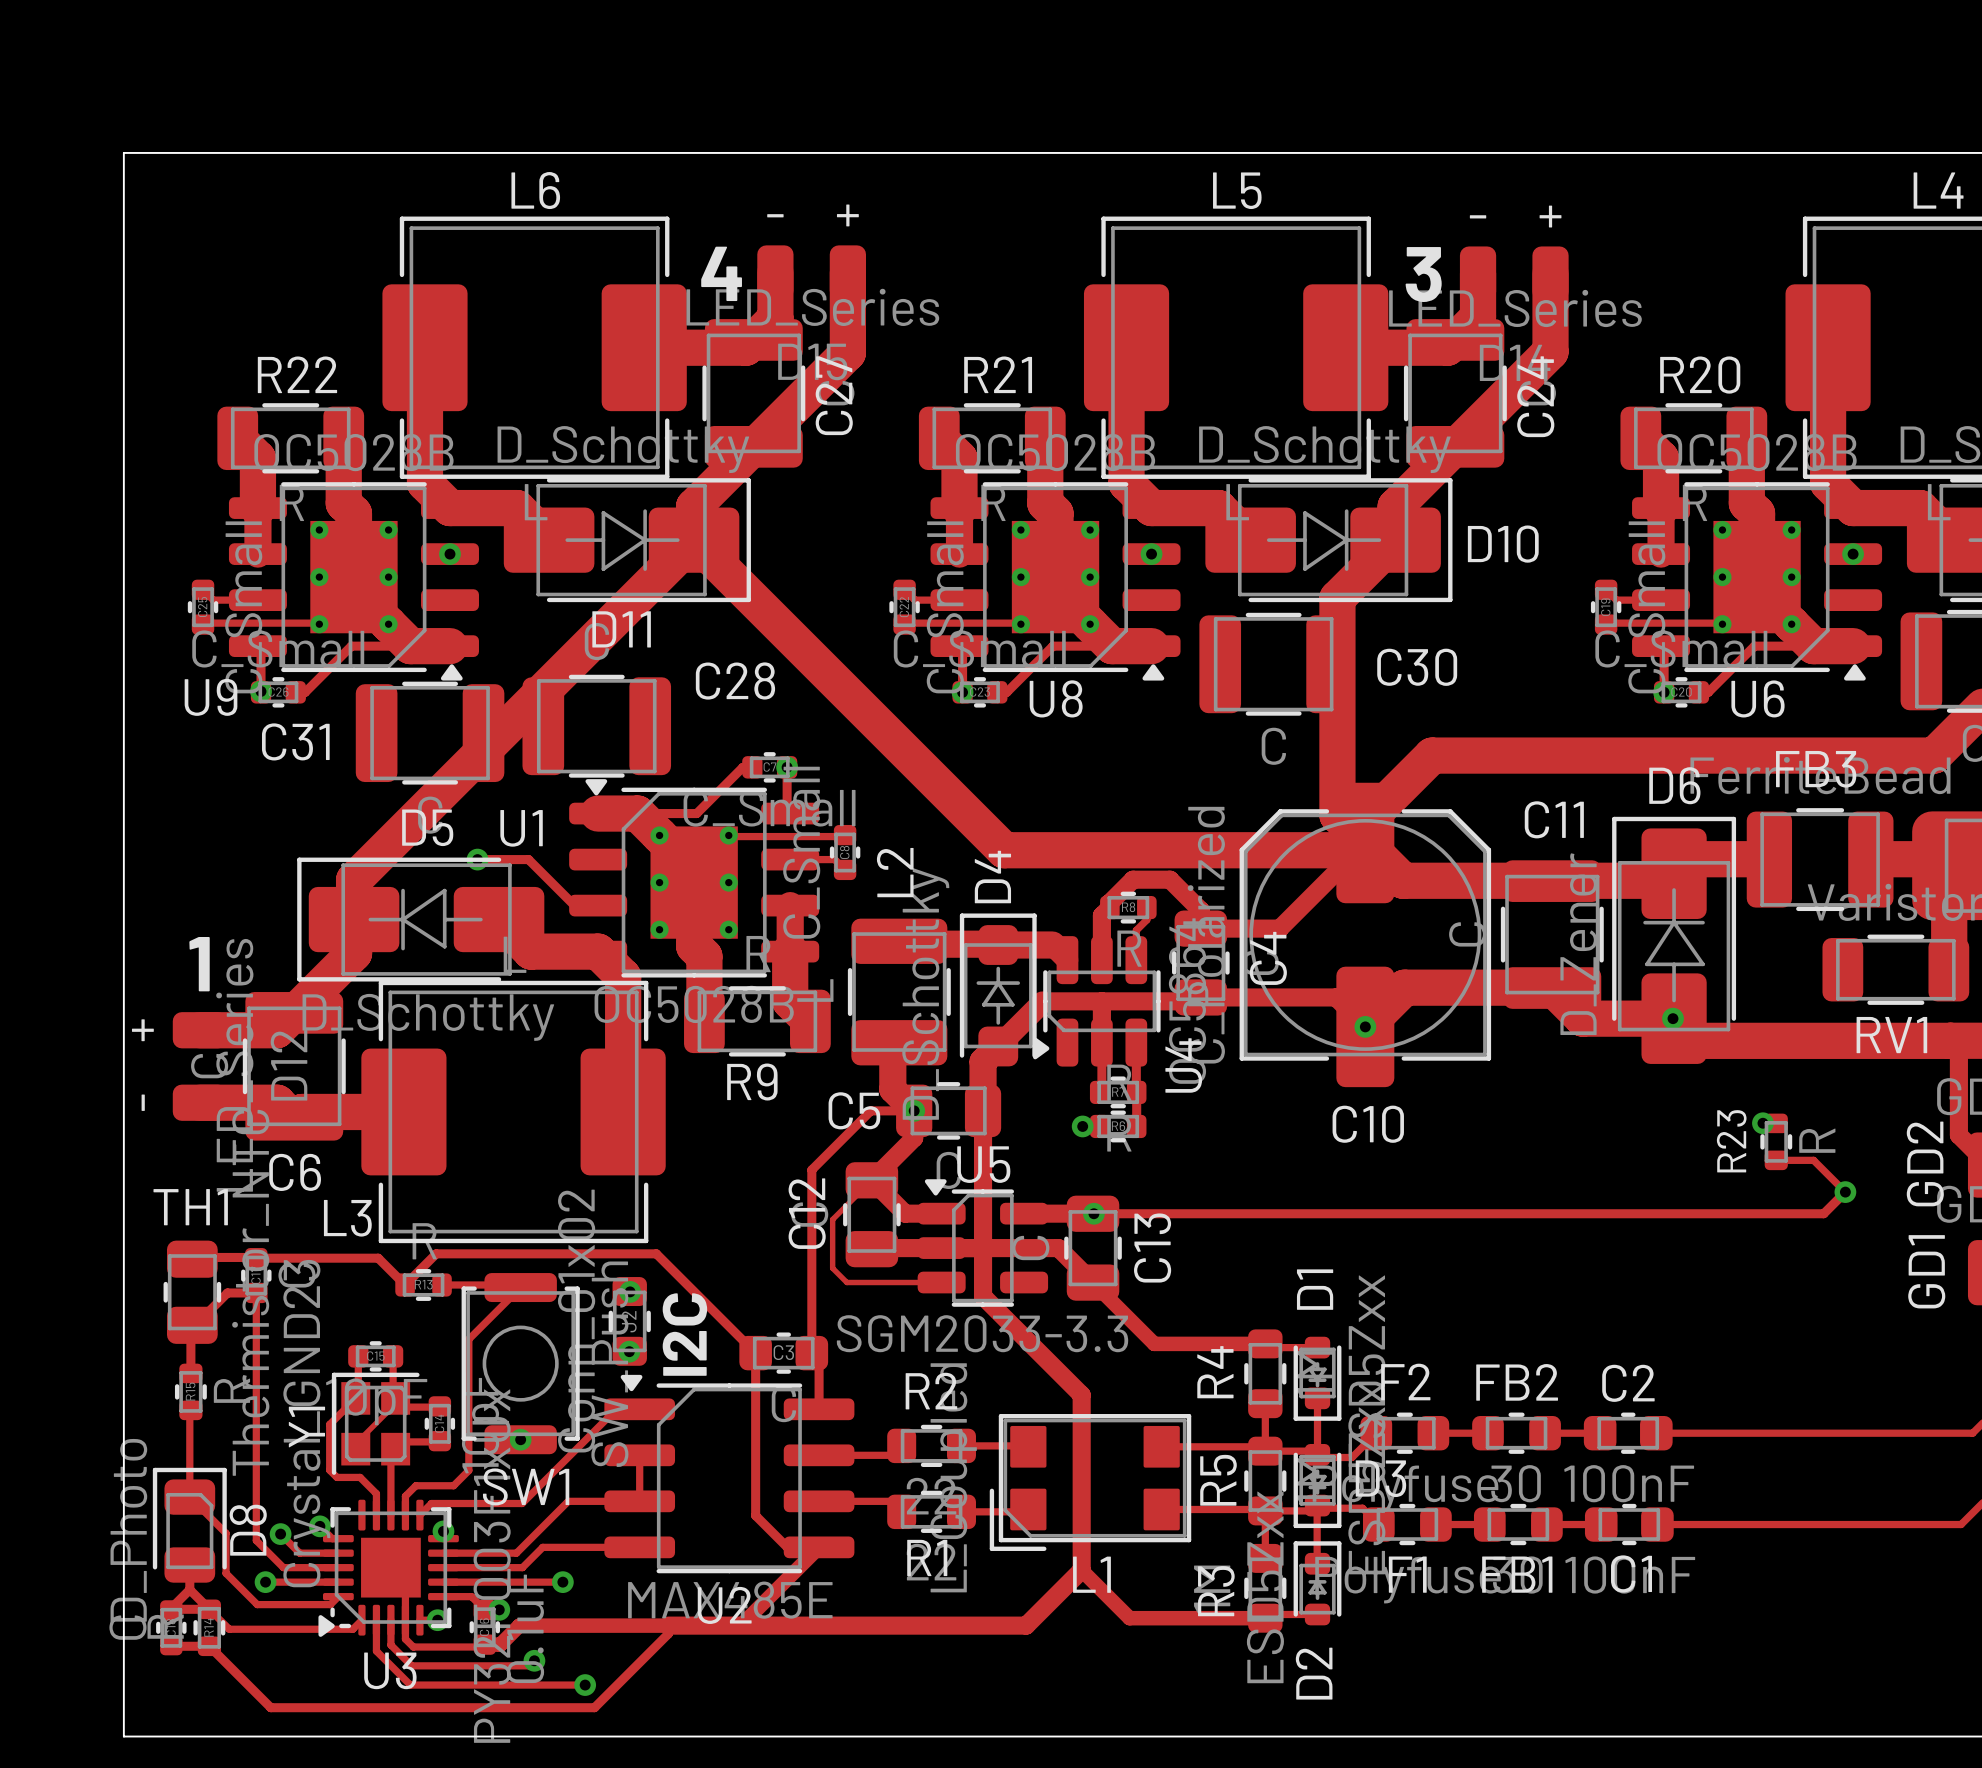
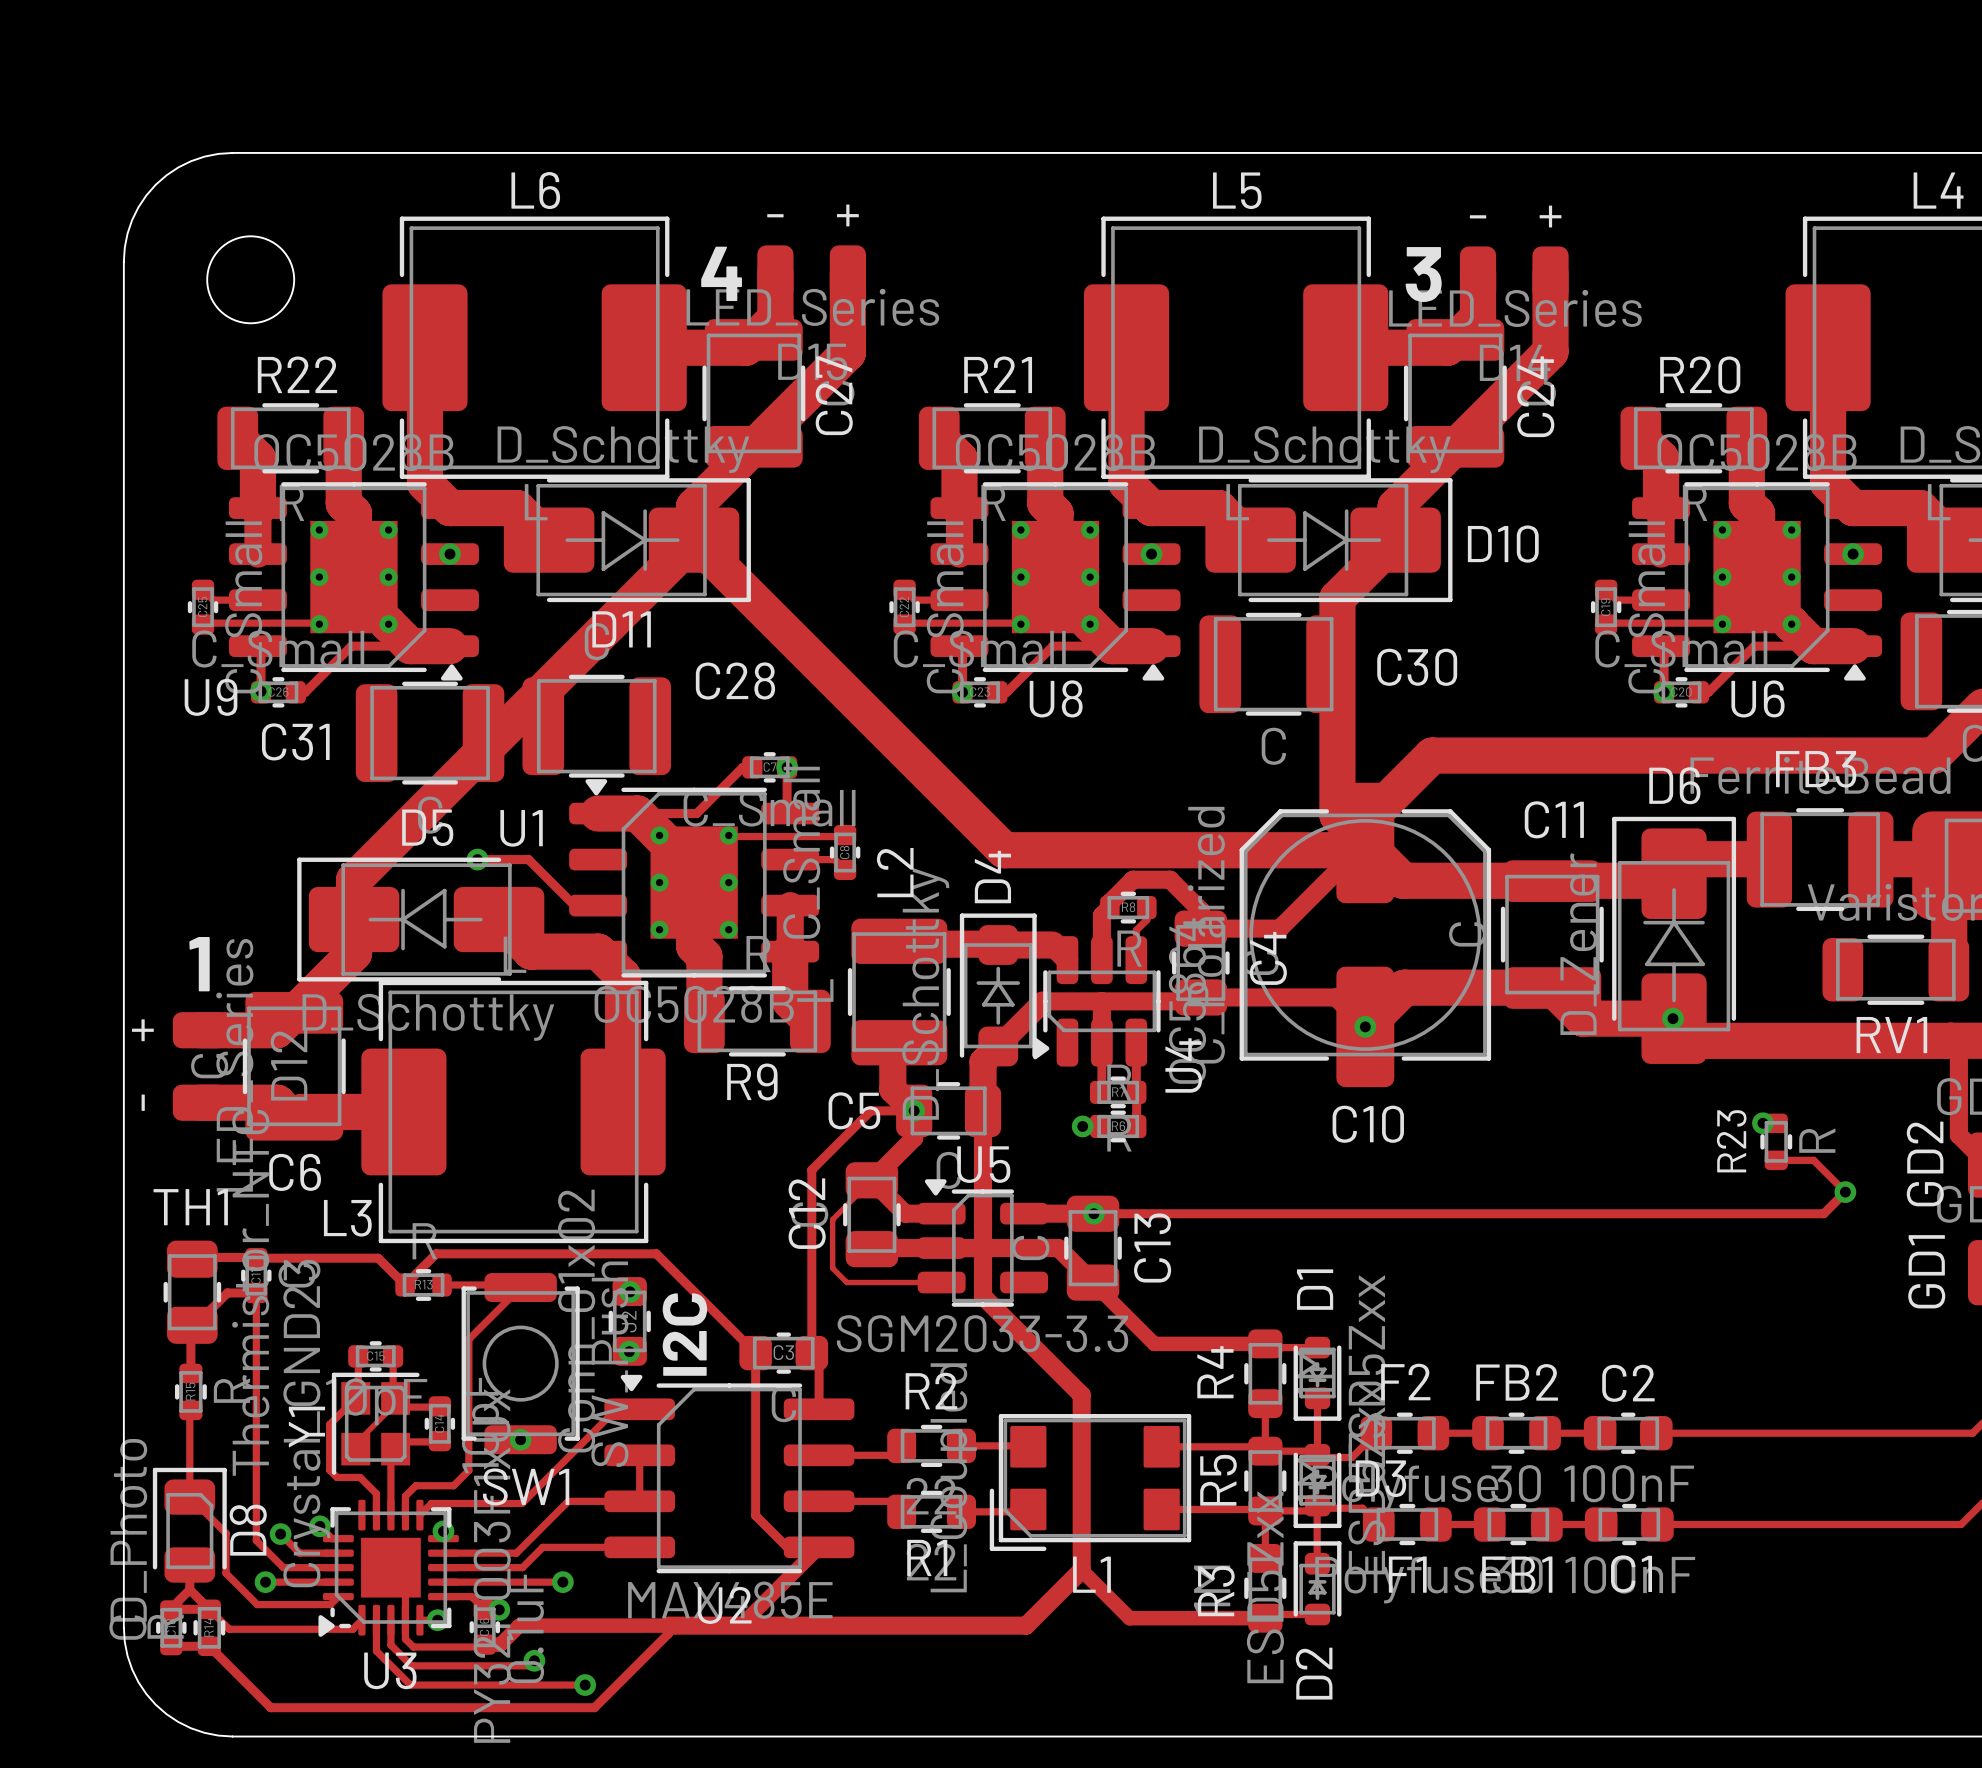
board edge: (232, 152) (123, 152) (123, 261) -> (232, 152) (218, 153) (190, 161) (178, 167) (155, 184) (146, 195) (132, 220) (127, 233) (123, 261)
round board edge: none -> [206, 235, 296, 325]
board edge: (123, 1627) (123, 1736) (232, 1736) -> (123, 1627) (124, 1641) (132, 1669) (138, 1682) (155, 1704) (178, 1721) (190, 1728) (204, 1732) (232, 1736)

